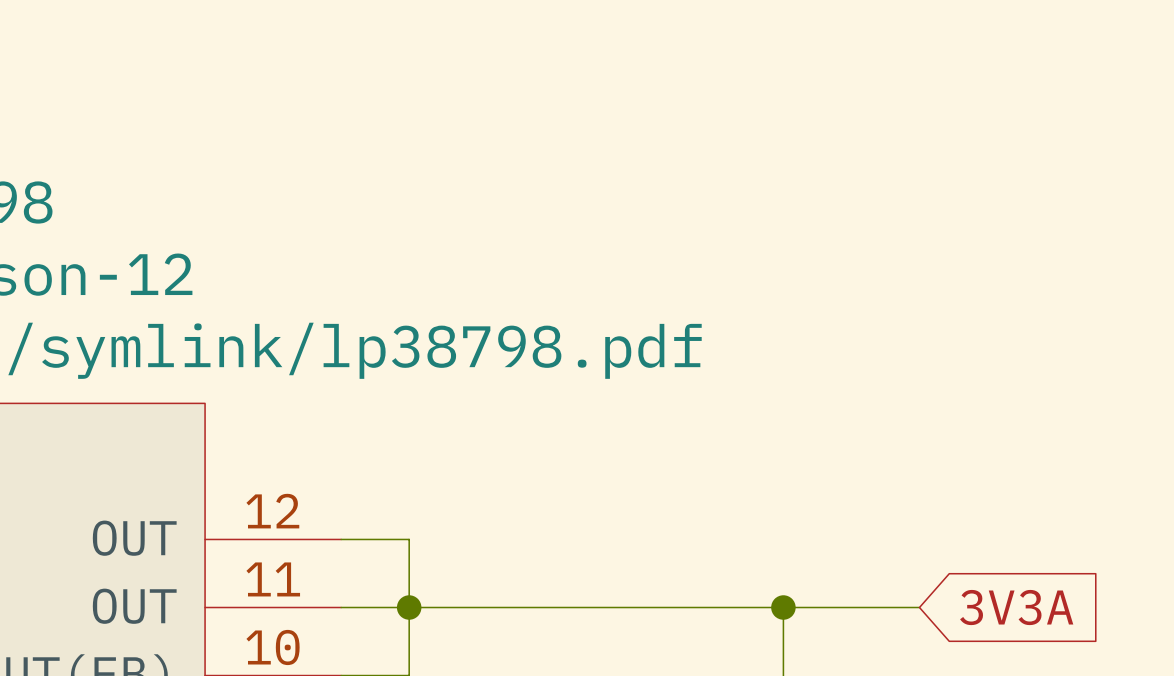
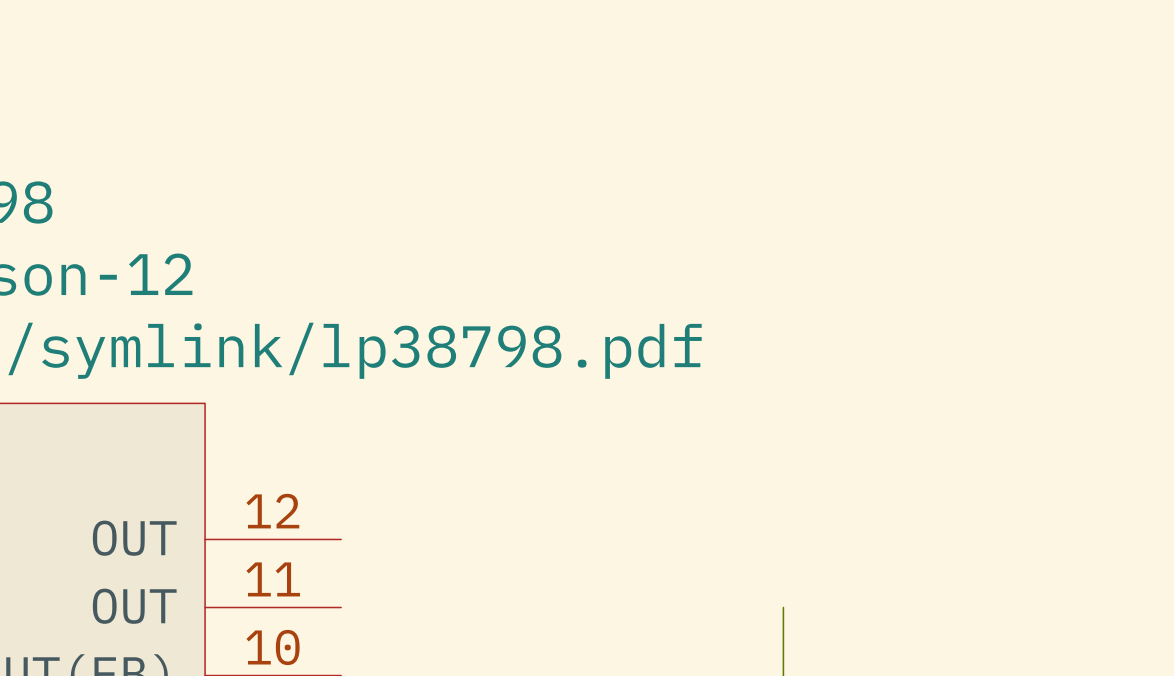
wire: (341, 539) (409, 539) (409, 675) (341, 675) -> none
wire: (341, 607) (919, 607) -> none
junction: (409, 607) -> none
junction: (783, 607) -> none
global label: 3V3A (1016, 607) -> none

